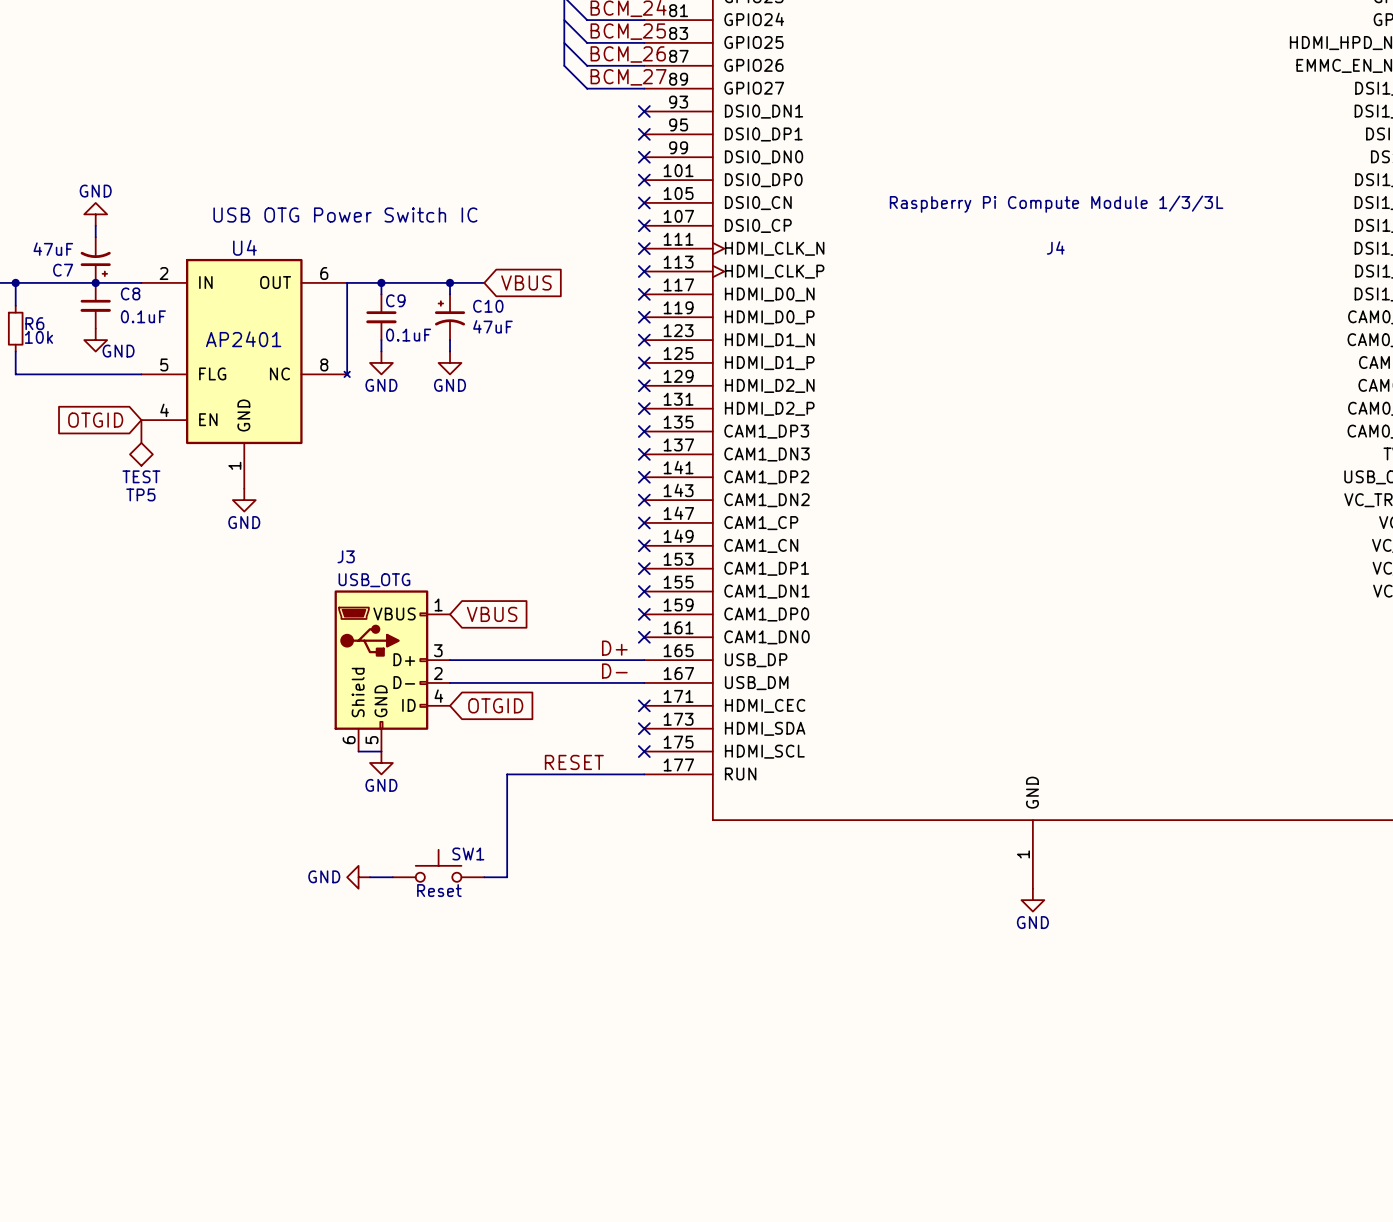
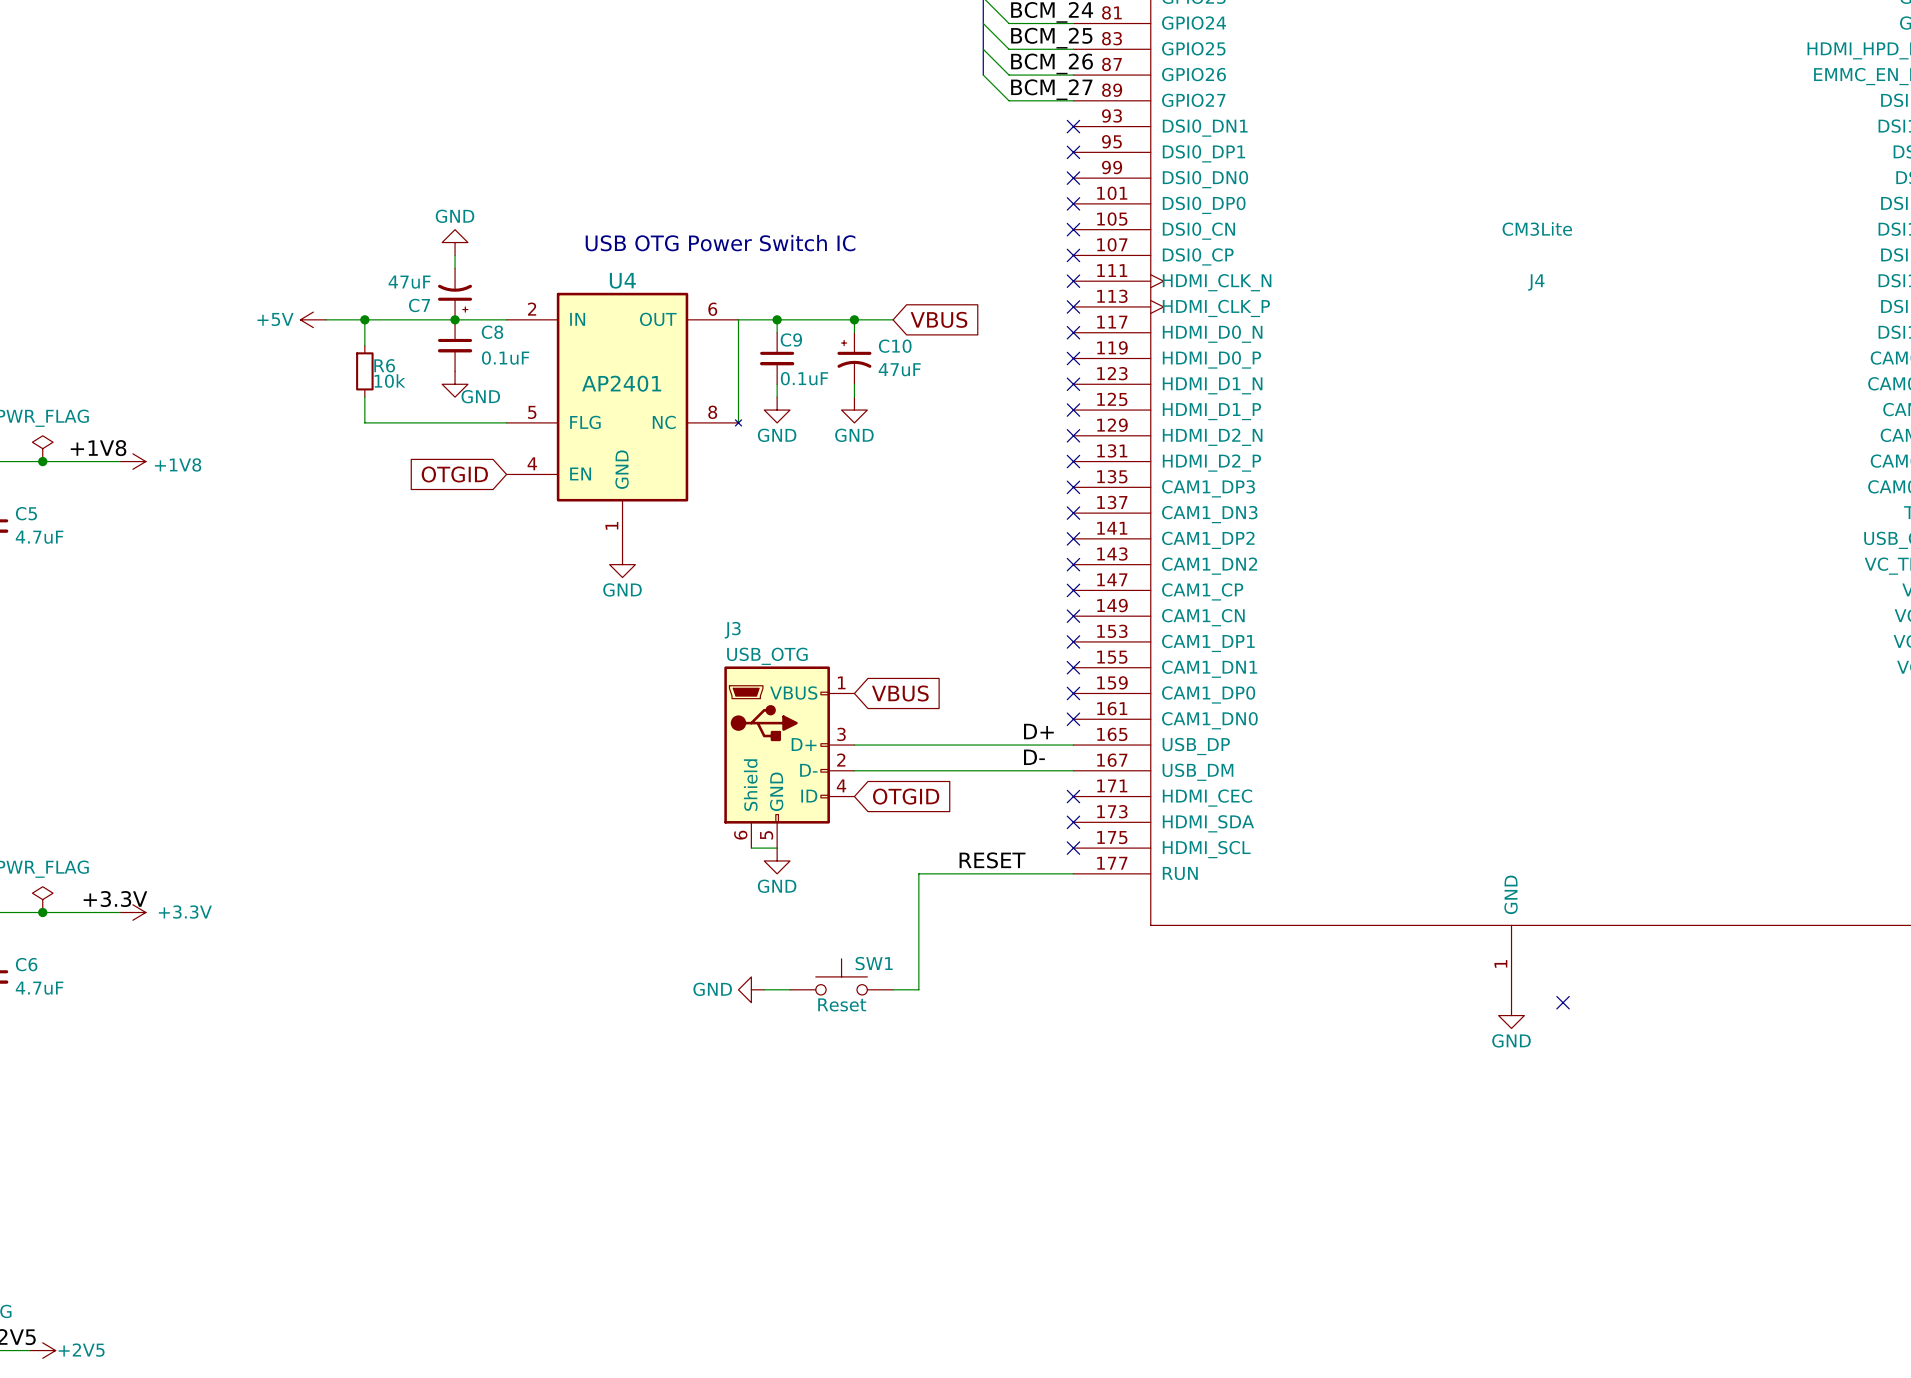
J4 value: Raspberry Pi Compute Module 1/3/3L (1056, 204) -> CM3Lite (1537, 229)
TP5: TEST (141, 442) -> none
no-connect mark: none -> (1563, 1002)

